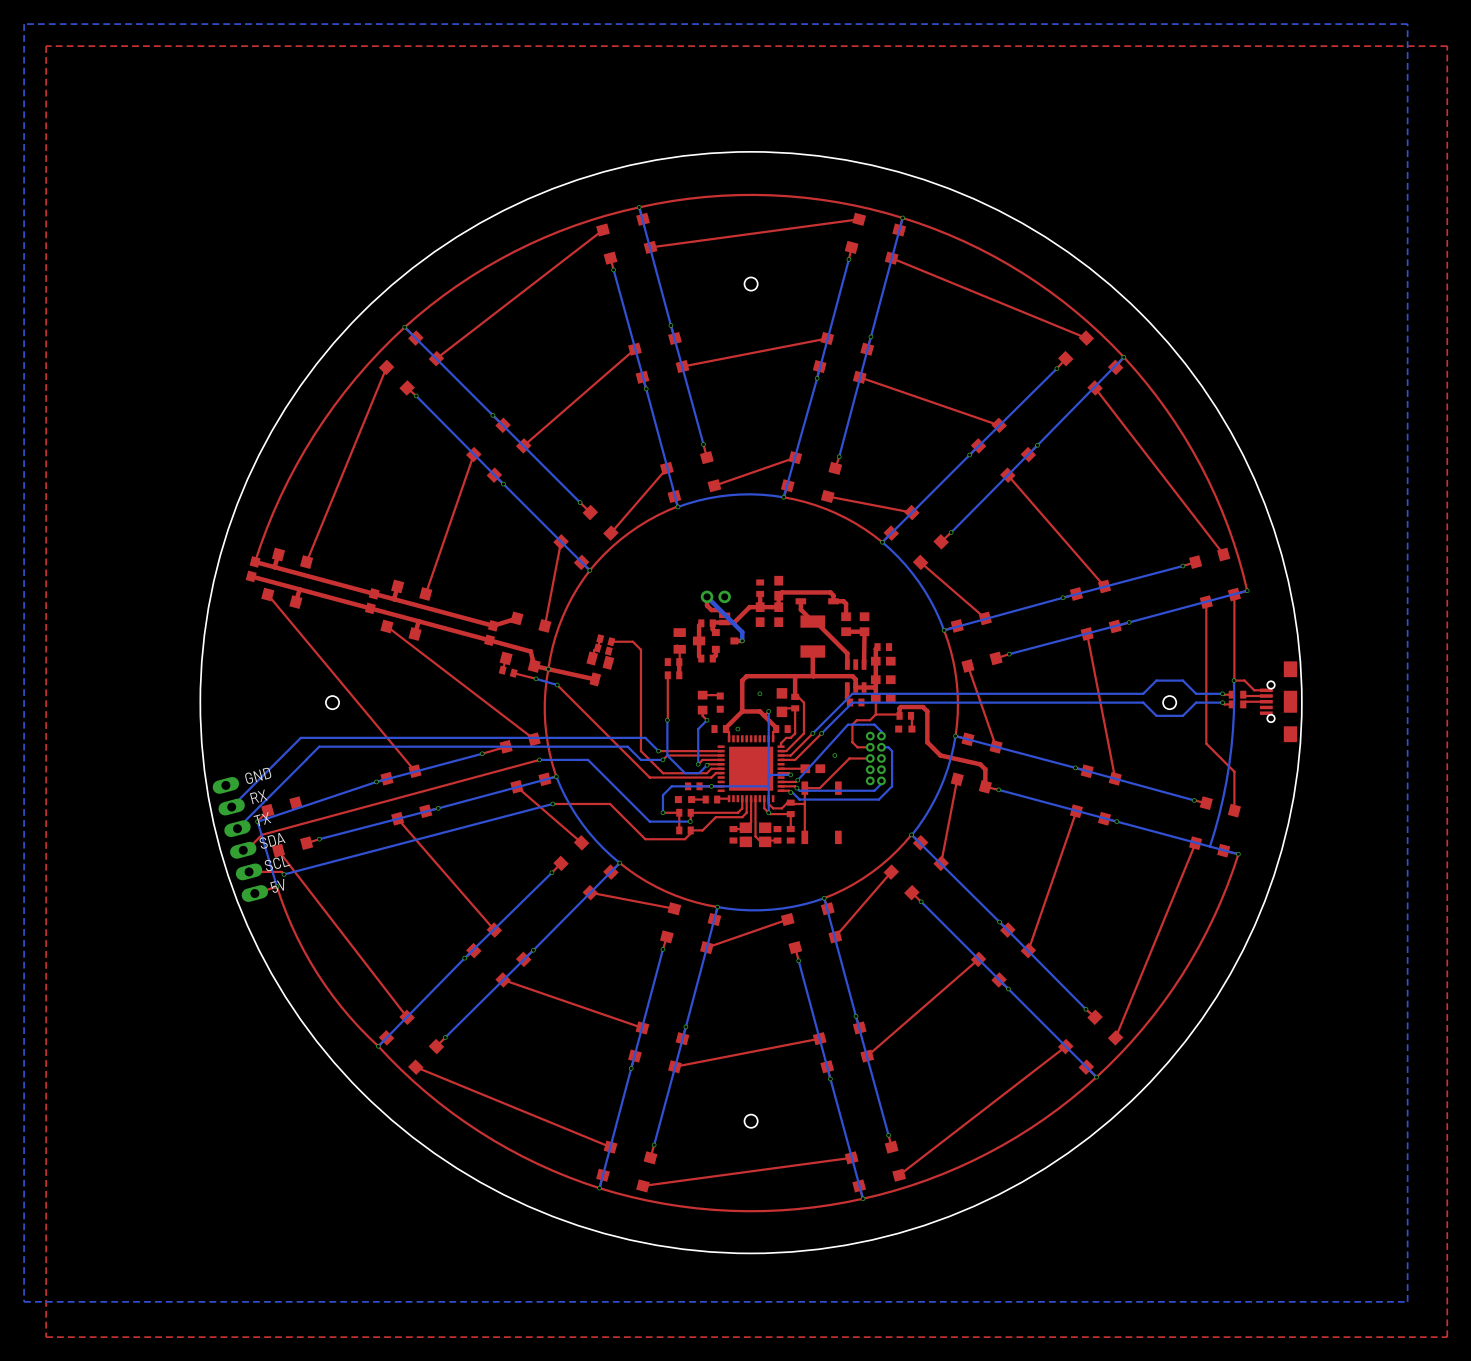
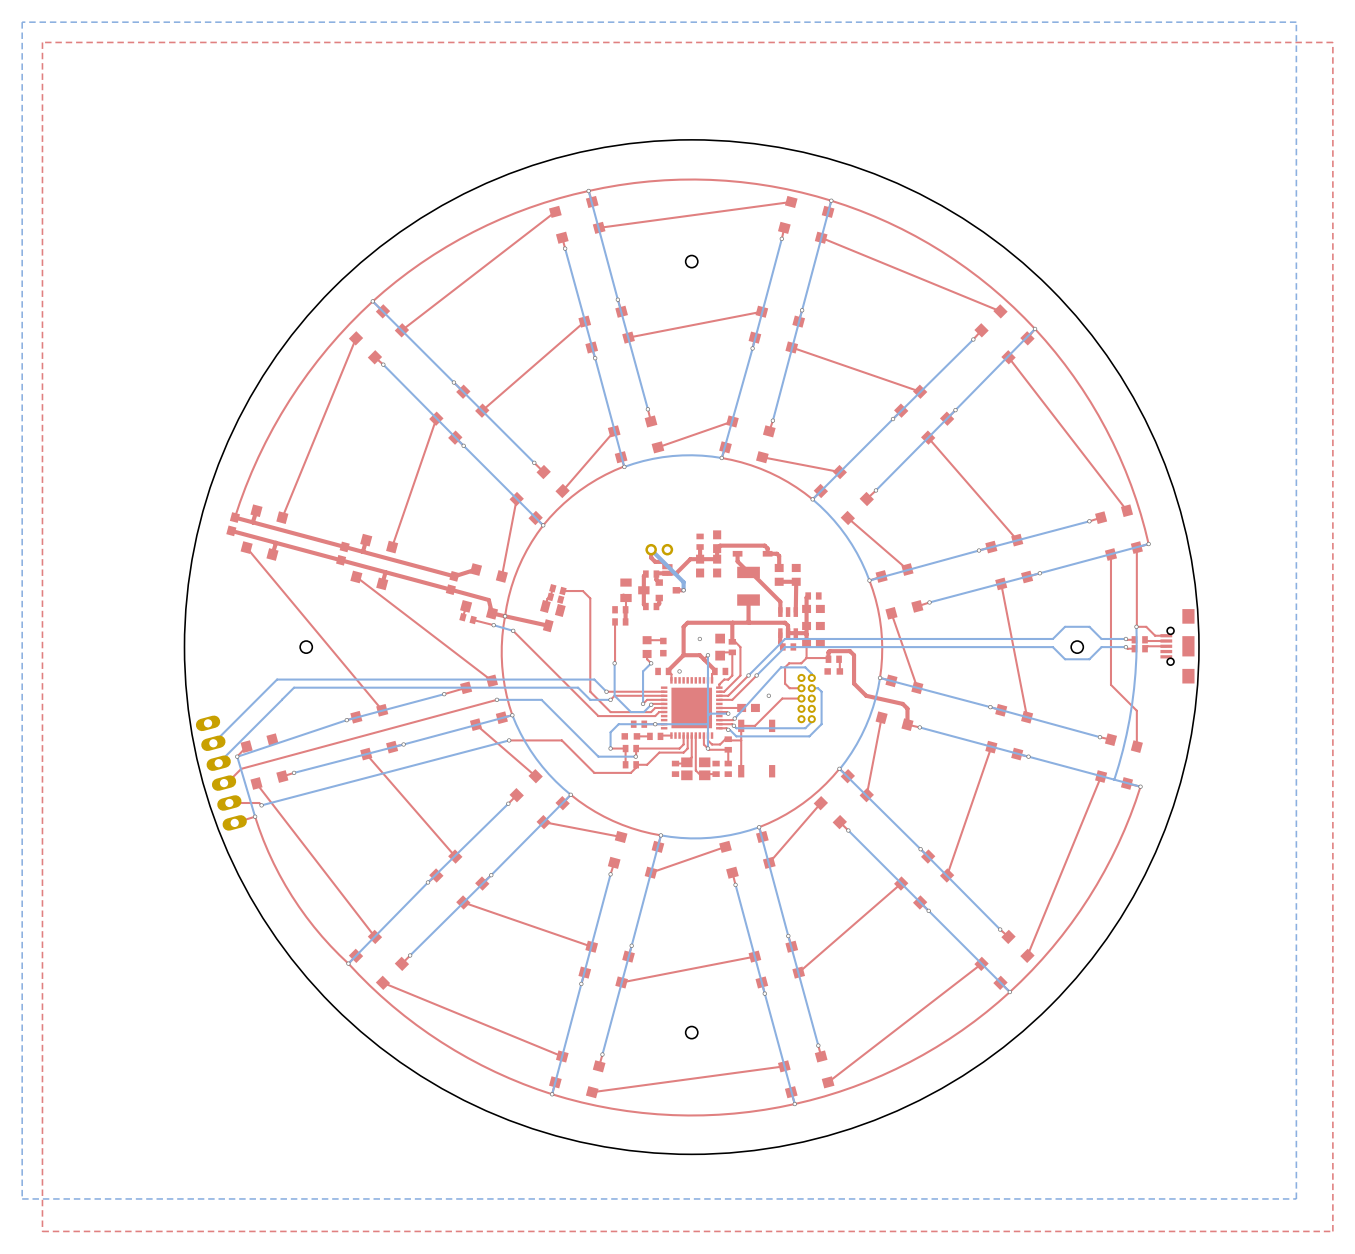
text: GND (258, 775) -> none
text: RX (258, 796) -> none
text: TX (262, 819) -> none
text: SDA (272, 840) -> none
text: SCL (277, 863) -> none
text: 5V (277, 885) -> none

